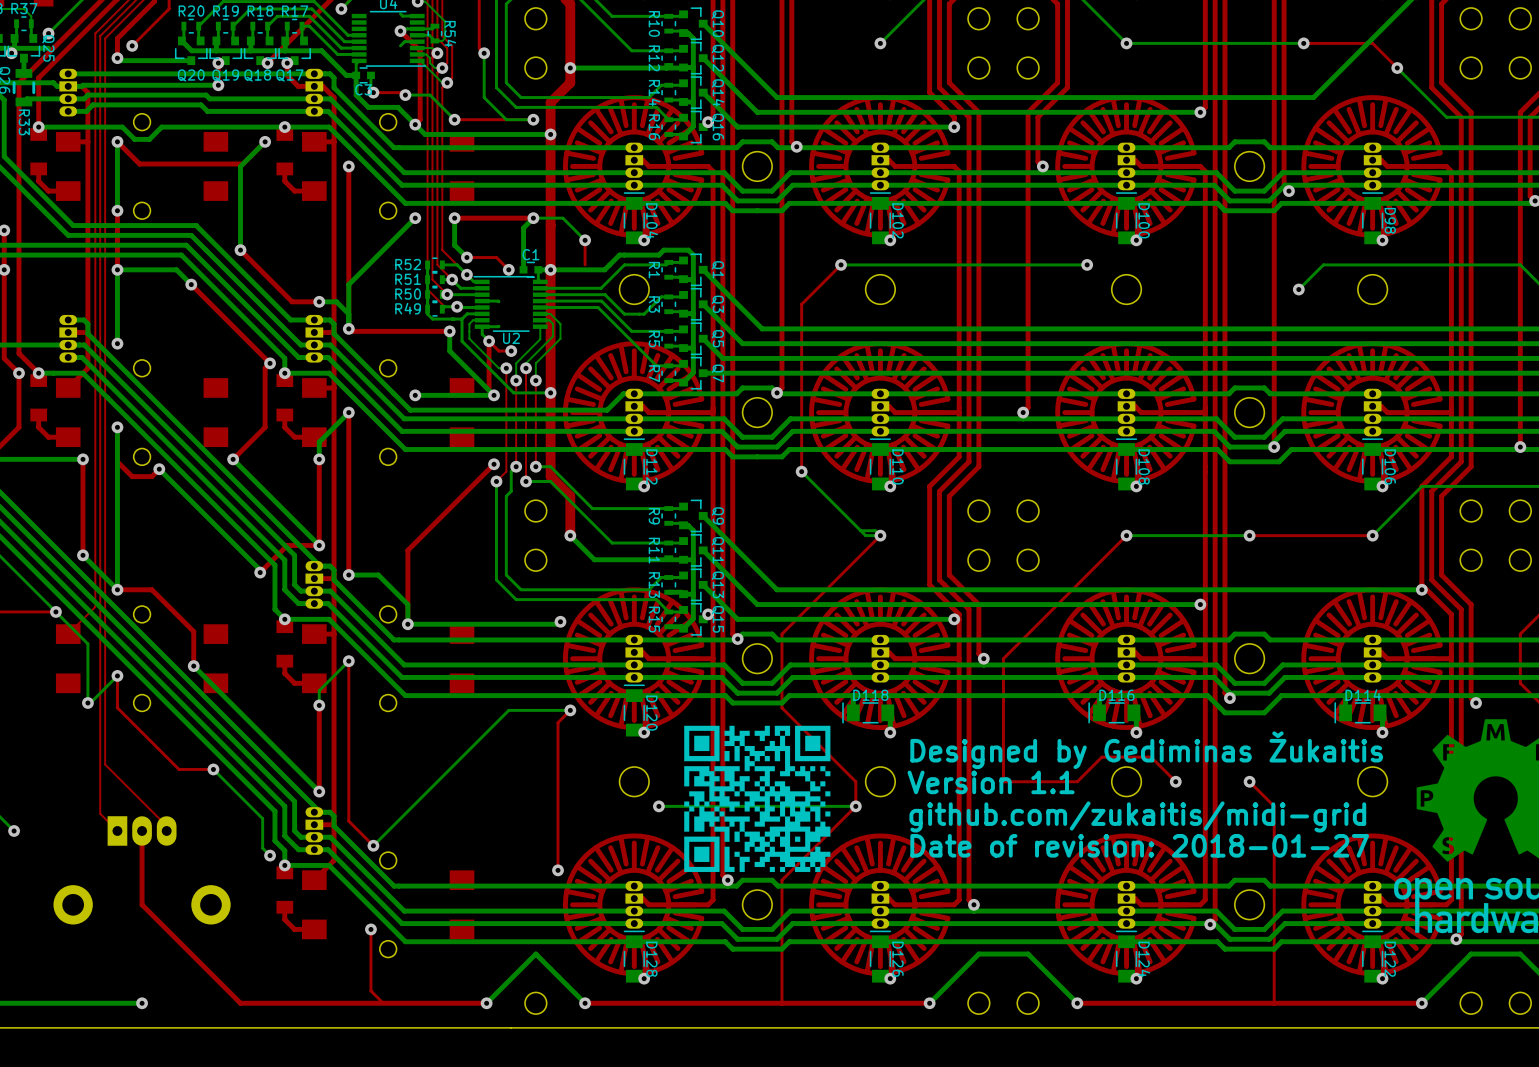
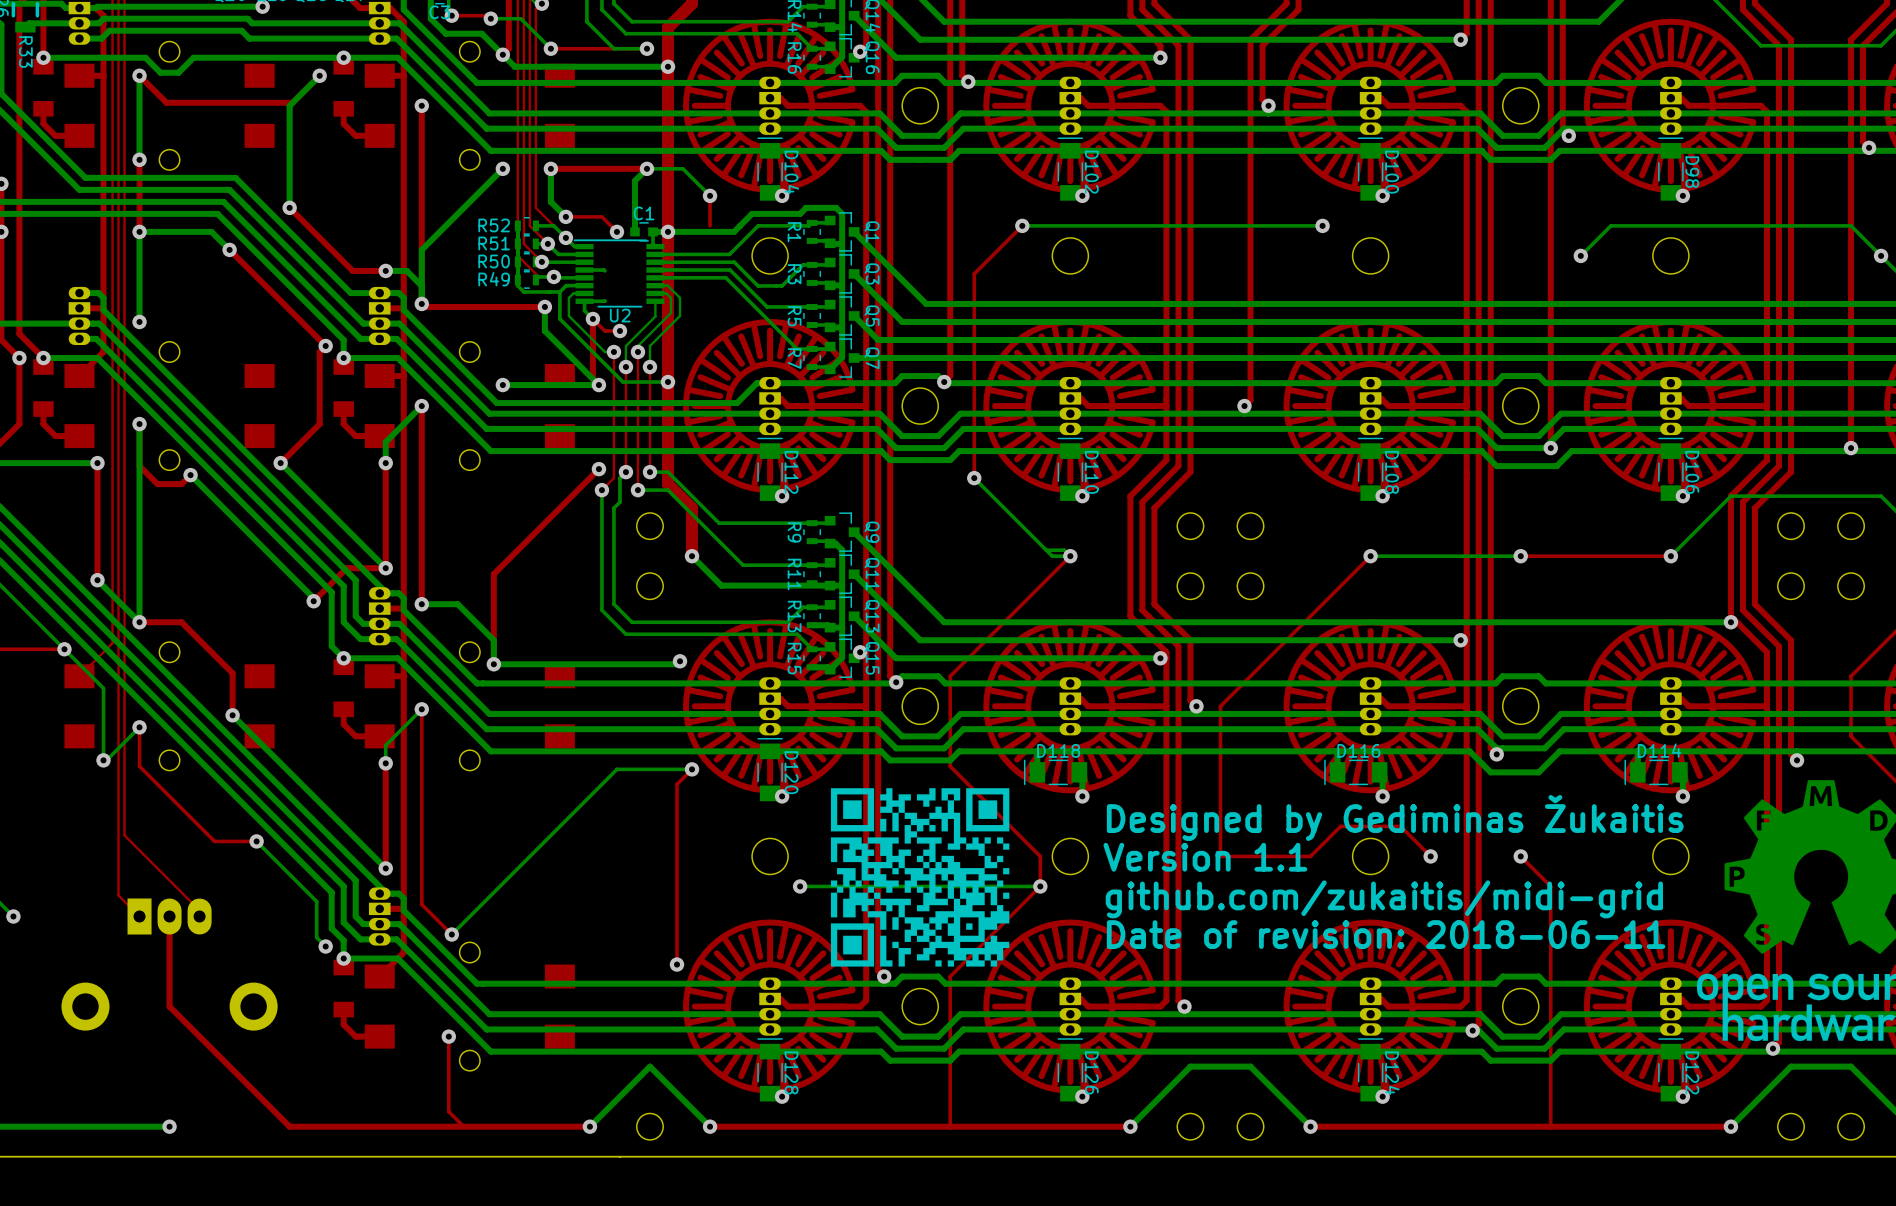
text: Date of revision: 2018-01-27 (1139, 845) -> Date of revision: 2018-06-11 (1386, 934)

